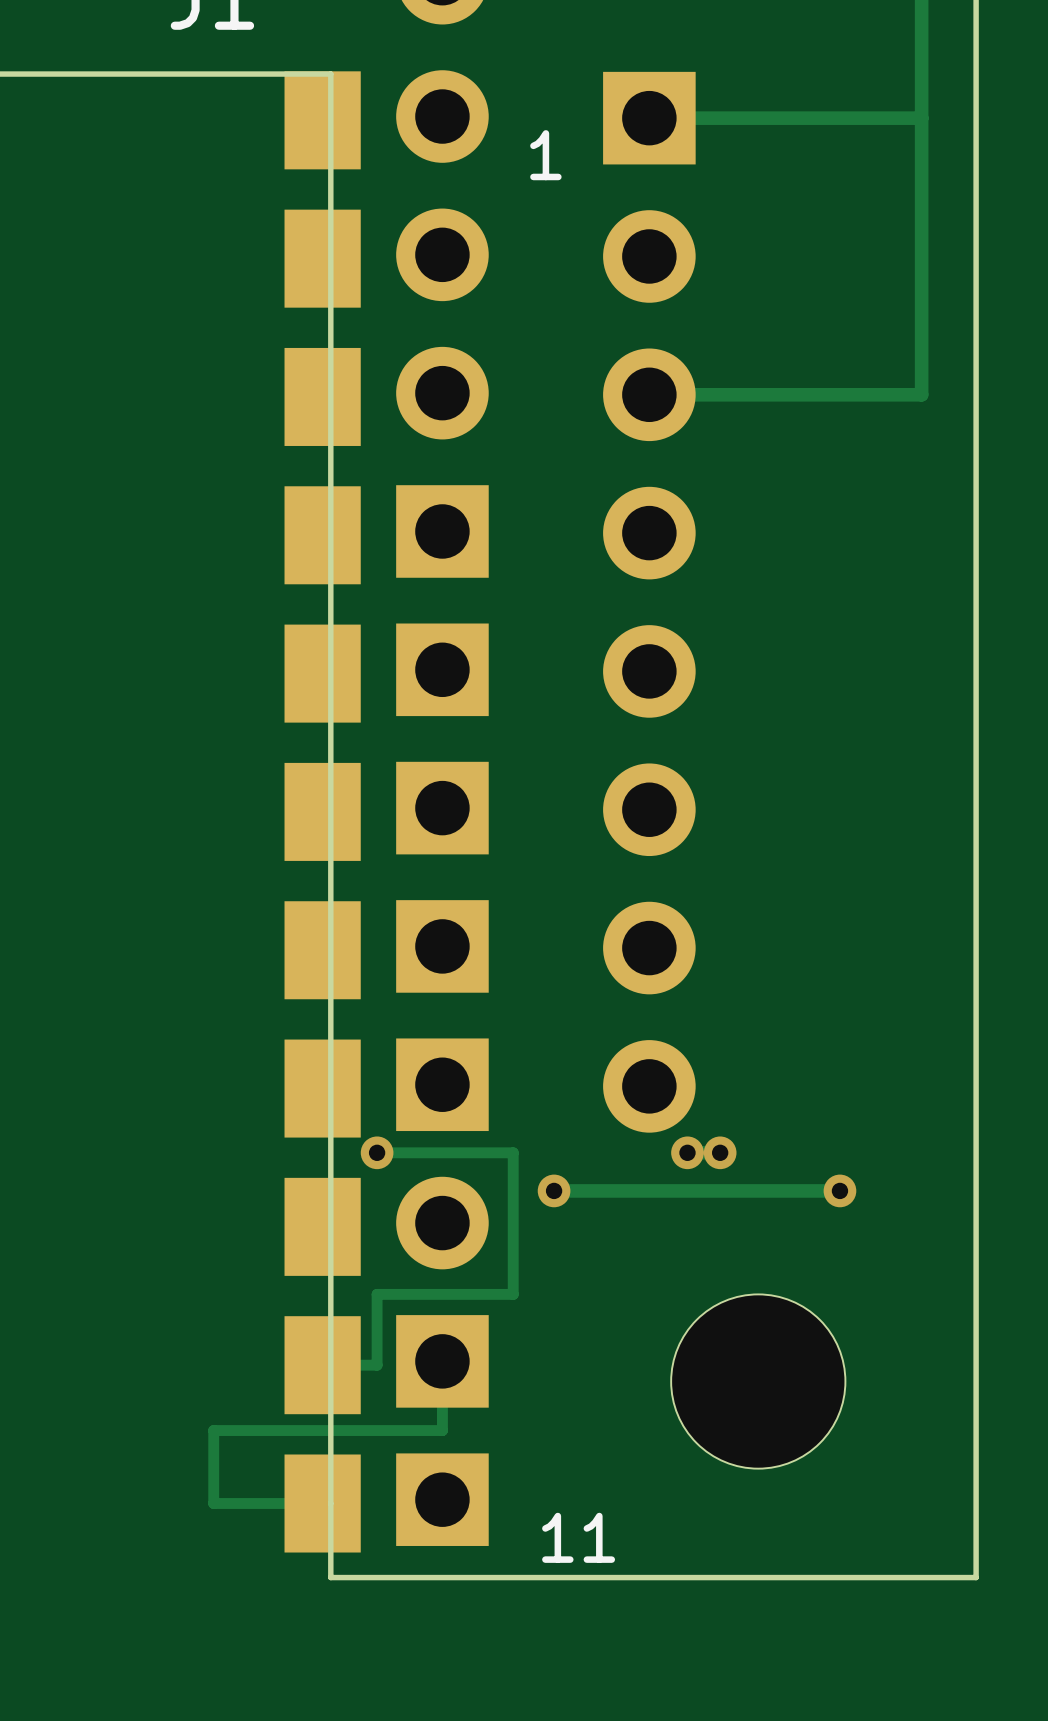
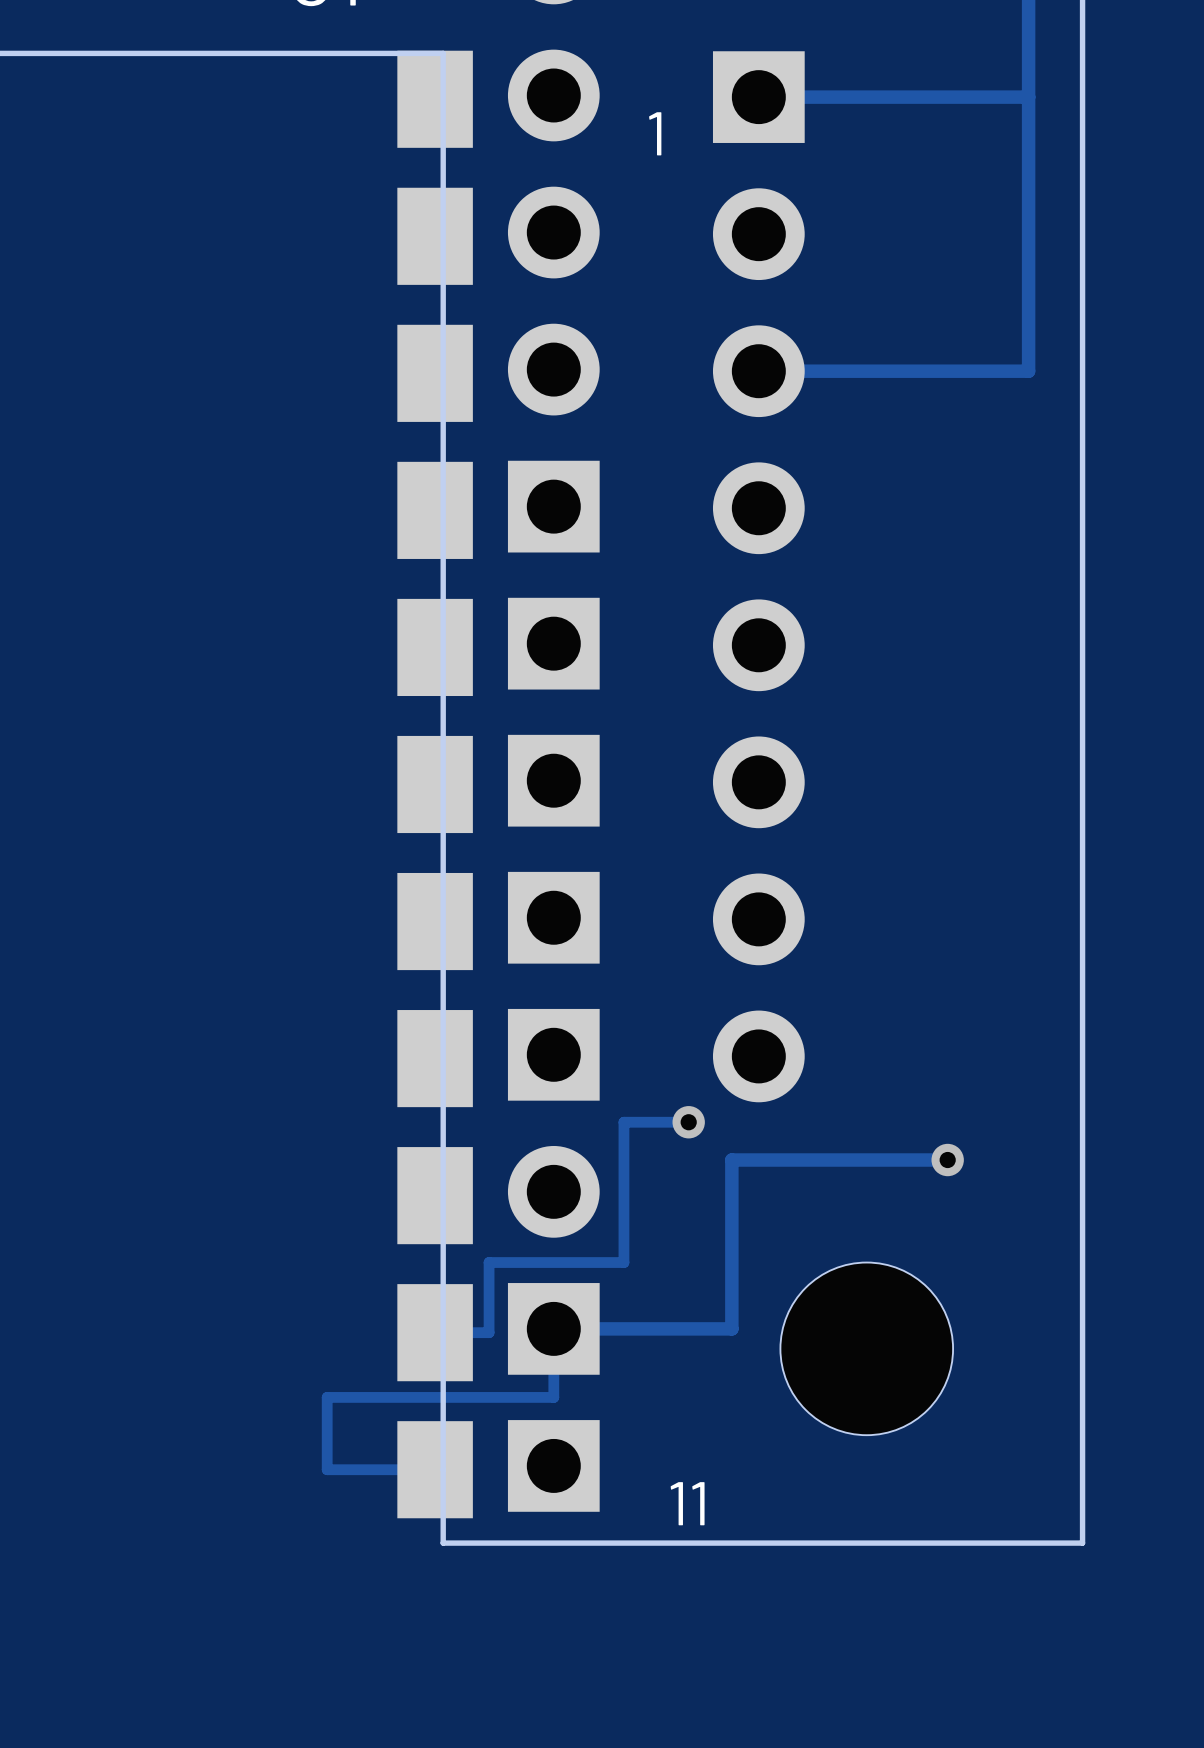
via: (377, 1152) -> none
track: (513, 1152) (377, 1152) -> (623, 1122) (688, 1122)
via: (687, 1152) -> none
via: (720, 1152) -> none
via position: (554, 1190) -> (688, 1122)
track: (622, 1190) (554, 1190) -> (731, 1160) (731, 1328) (553, 1328)

